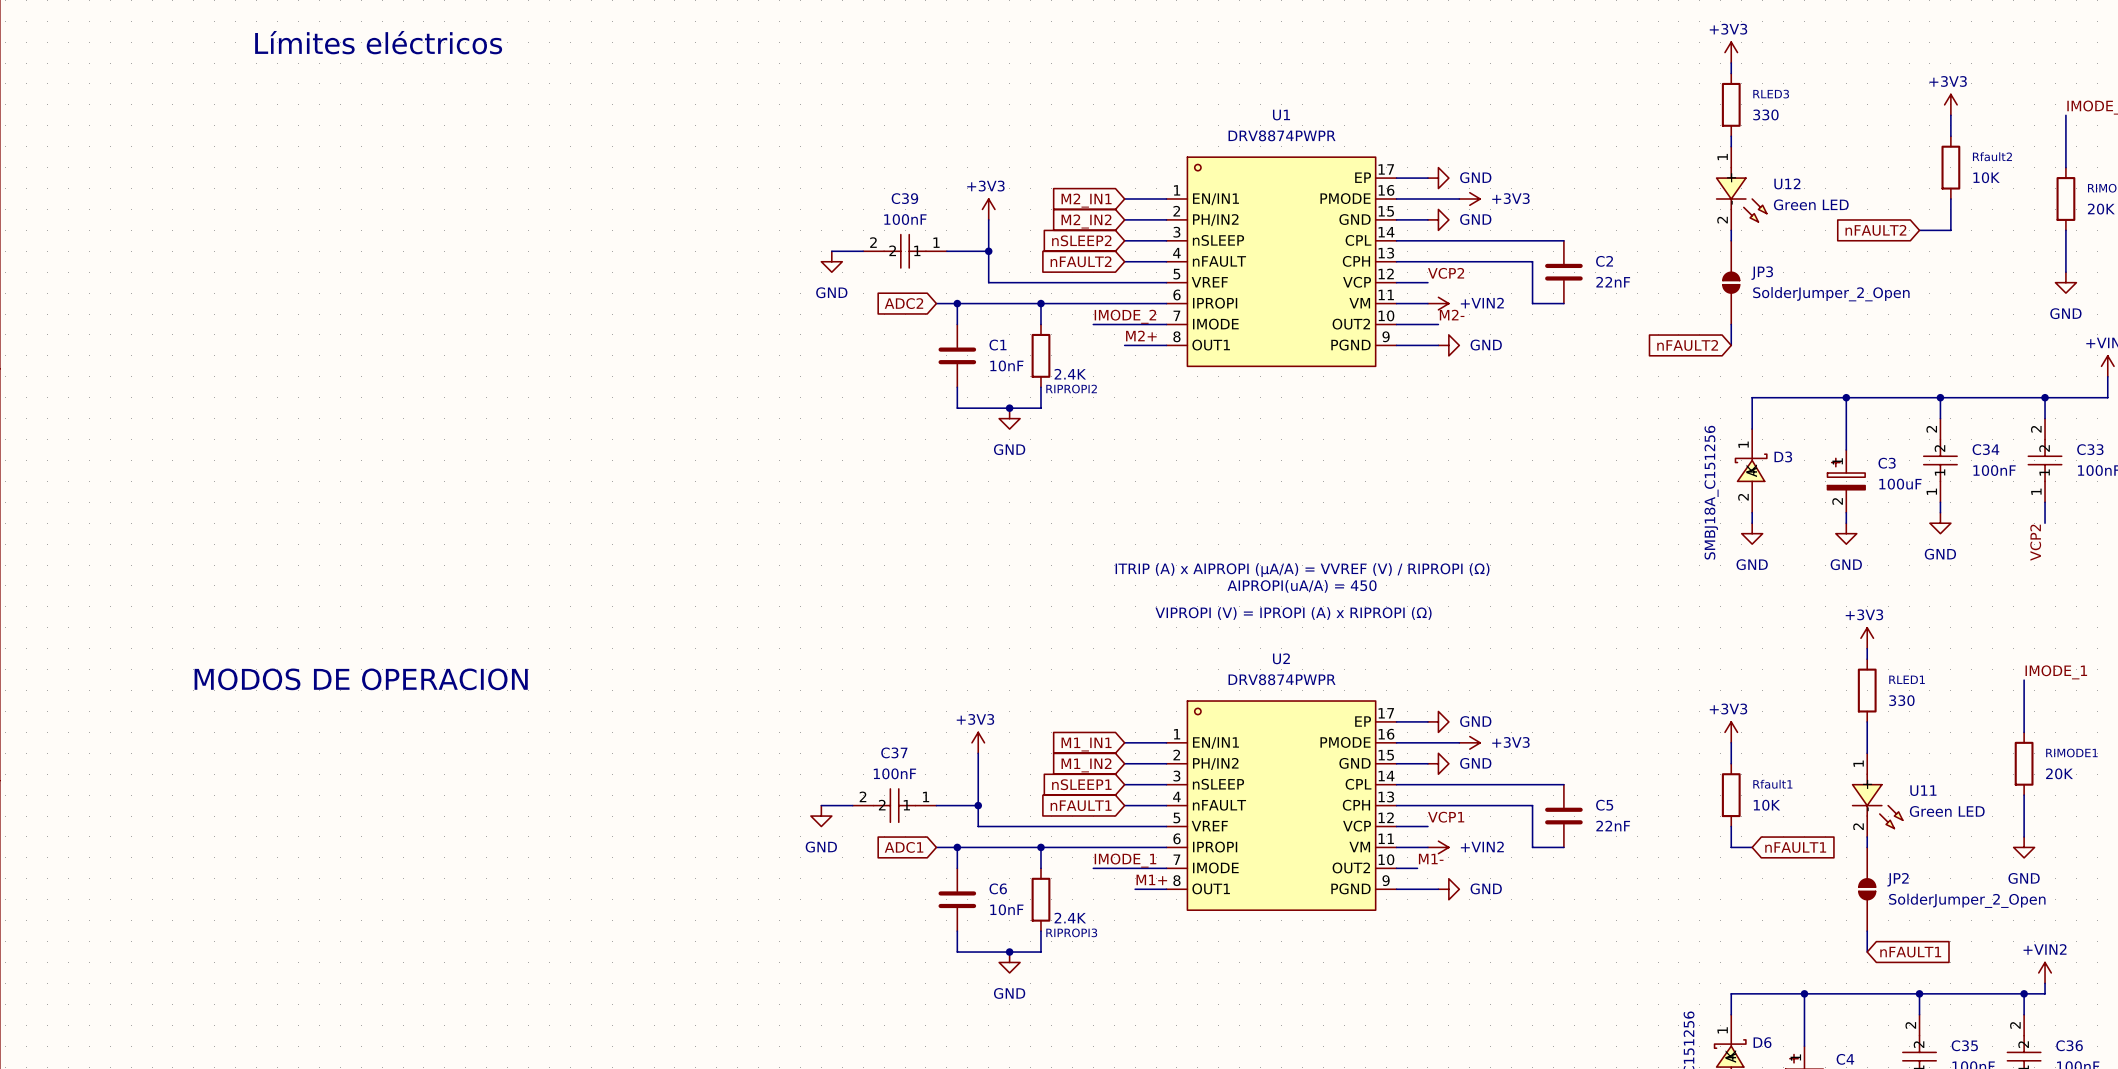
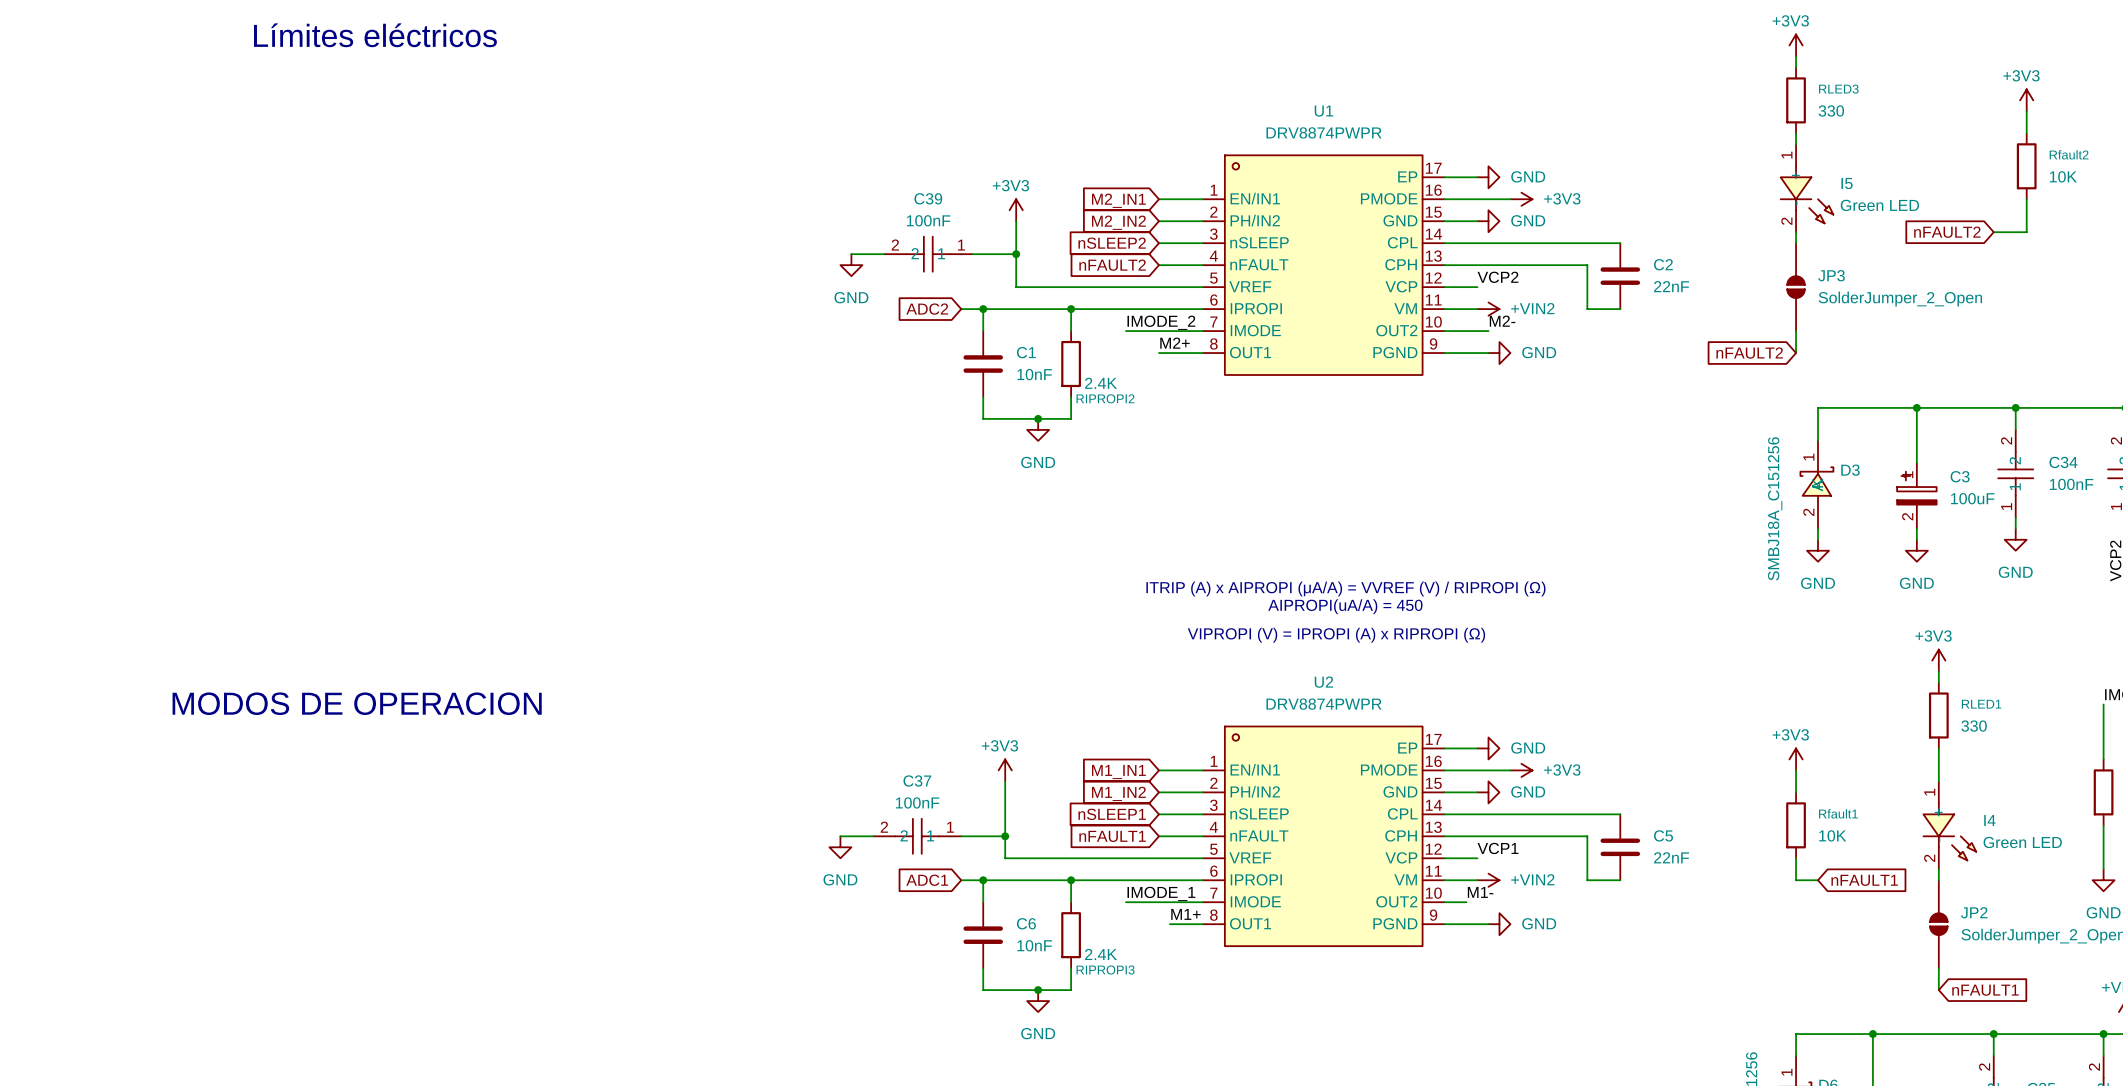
U12 name: U12 (1787, 183) -> I5 (1847, 183)
U11 name: U11 (1923, 790) -> I4 (1989, 820)

